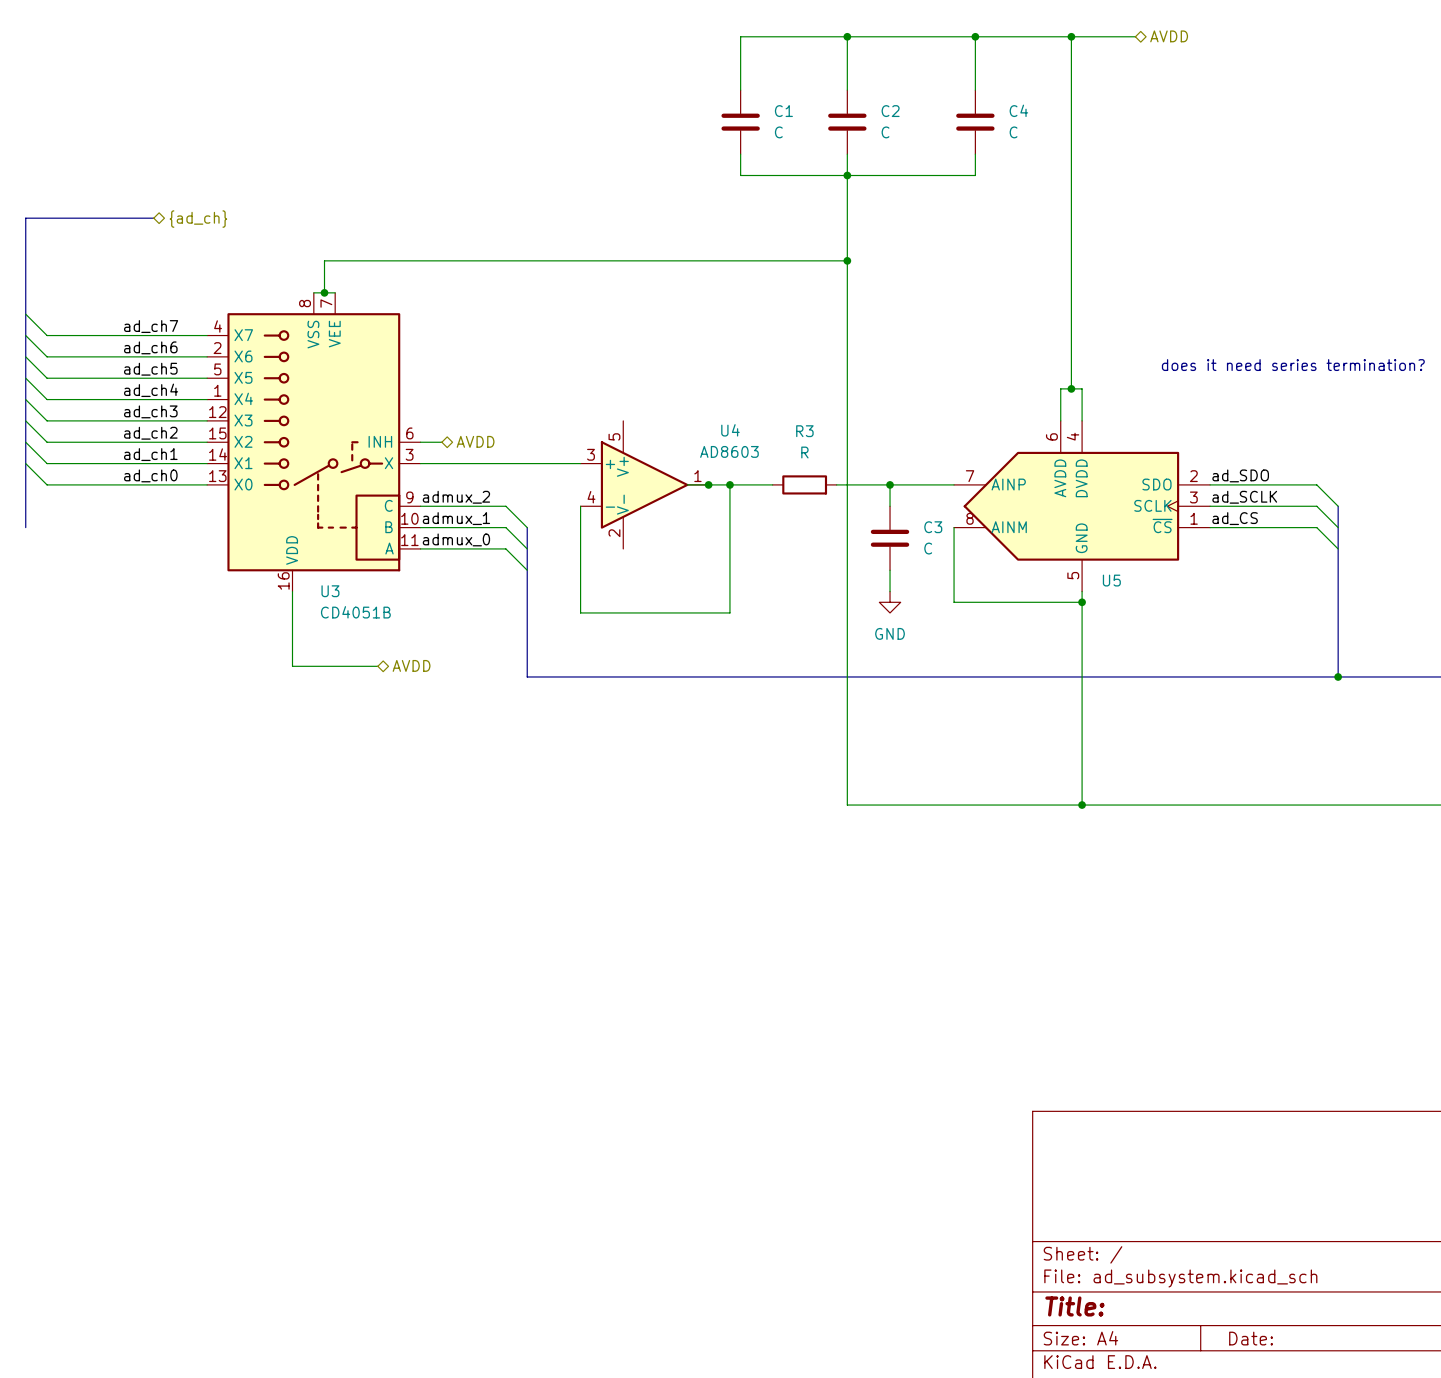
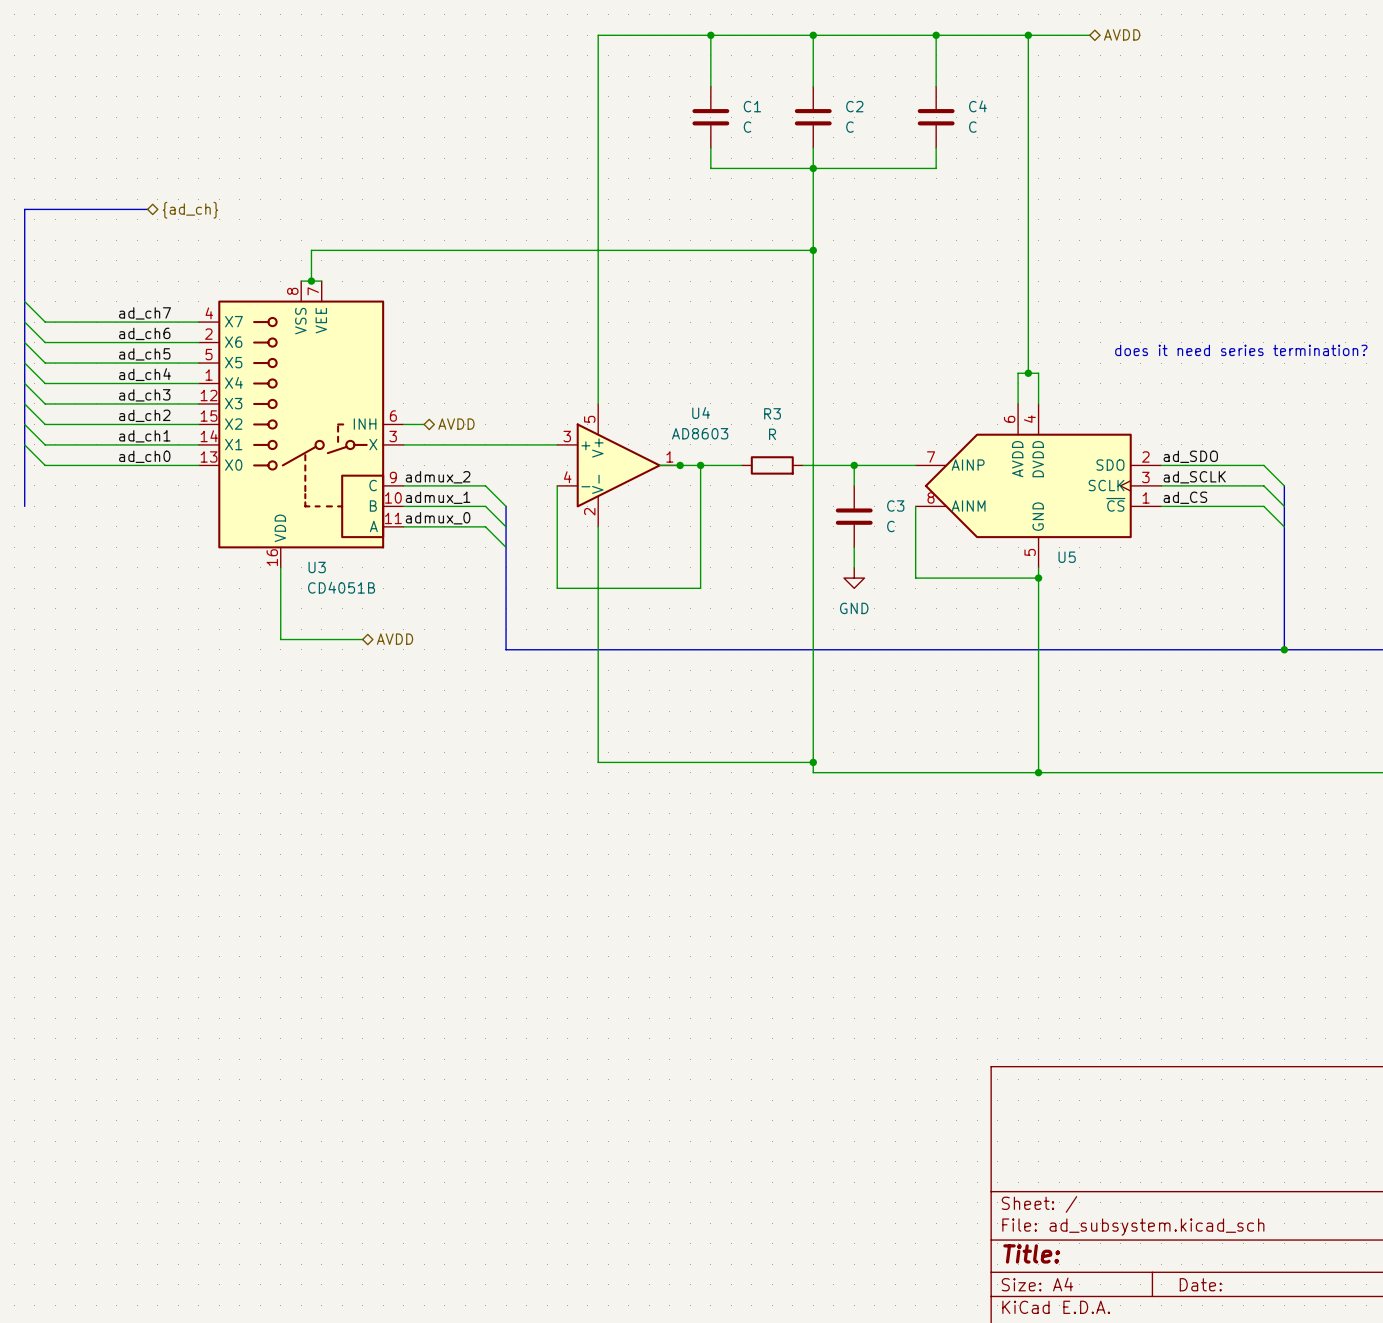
wire: none -> (710, 35) (598, 35) (598, 403)
junction: none -> (710, 35)
wire: none -> (598, 526) (598, 762) (813, 762)
junction: none -> (813, 762)

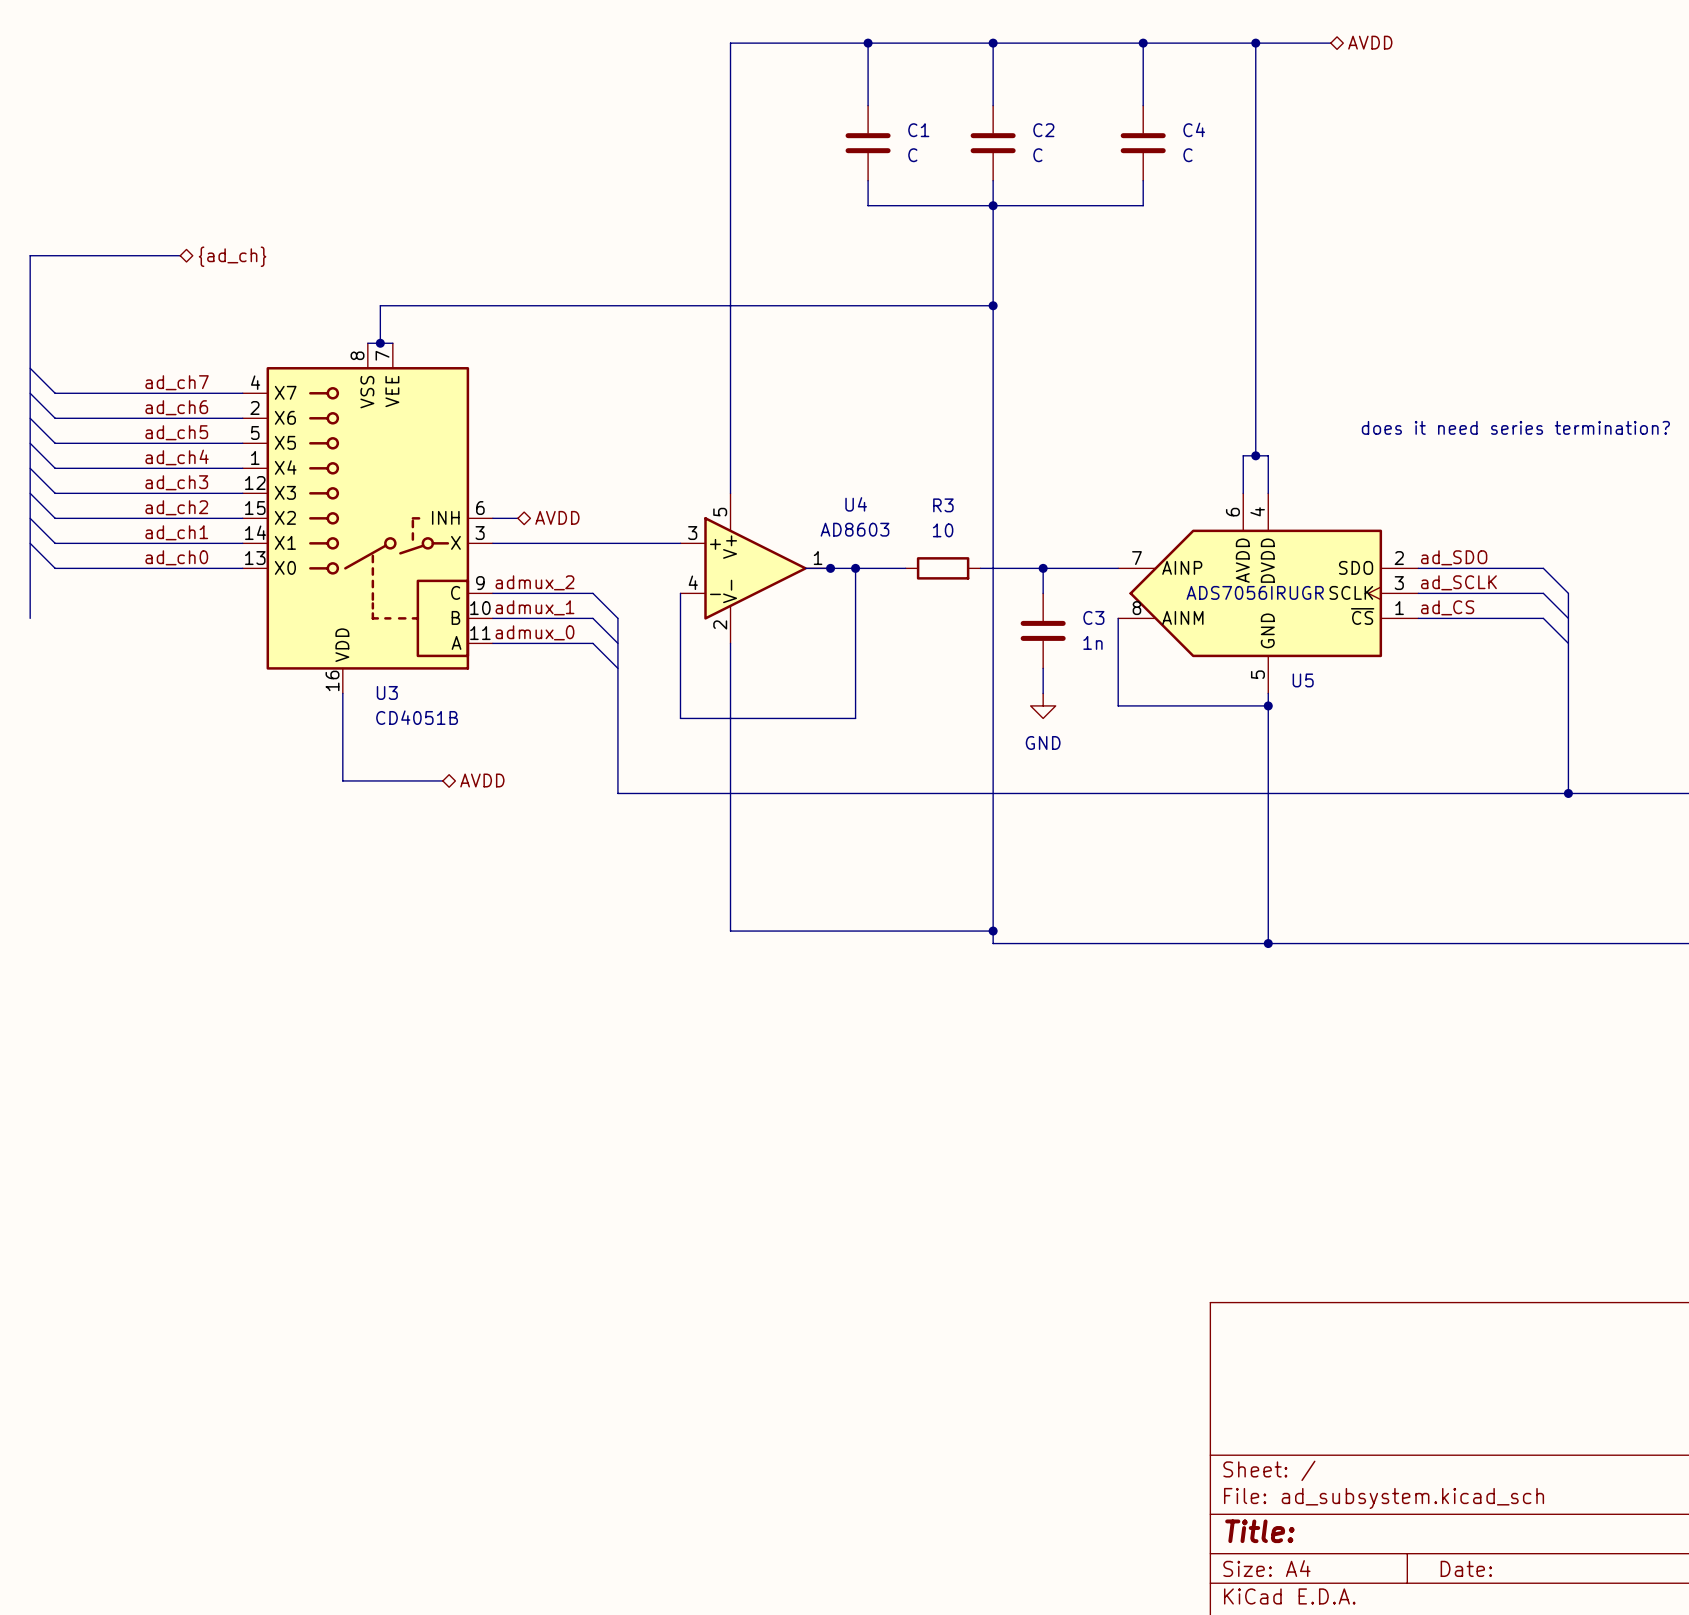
R3 value: R (772, 434) -> 10 (943, 530)
U5 value: none -> ADS7056IRUGR (1255, 592)
C3 value: C (890, 526) -> 1n (1092, 642)

